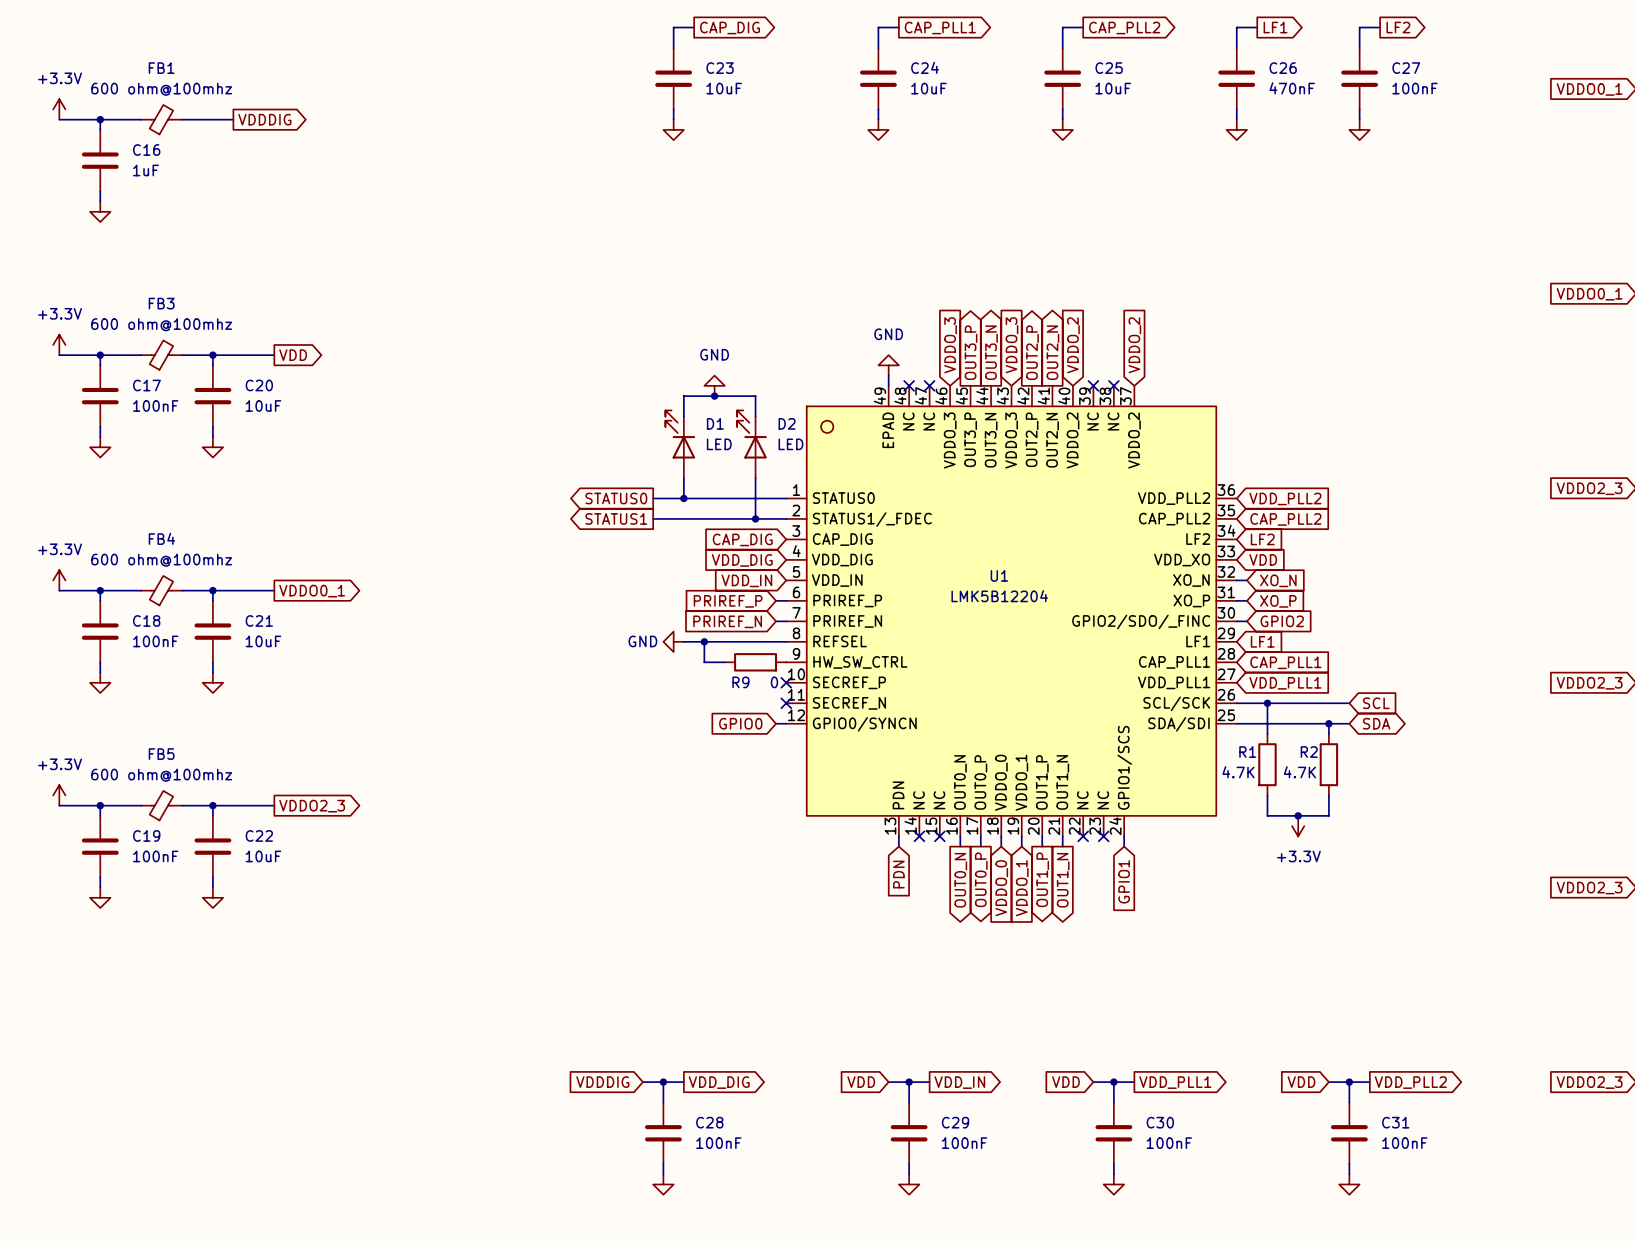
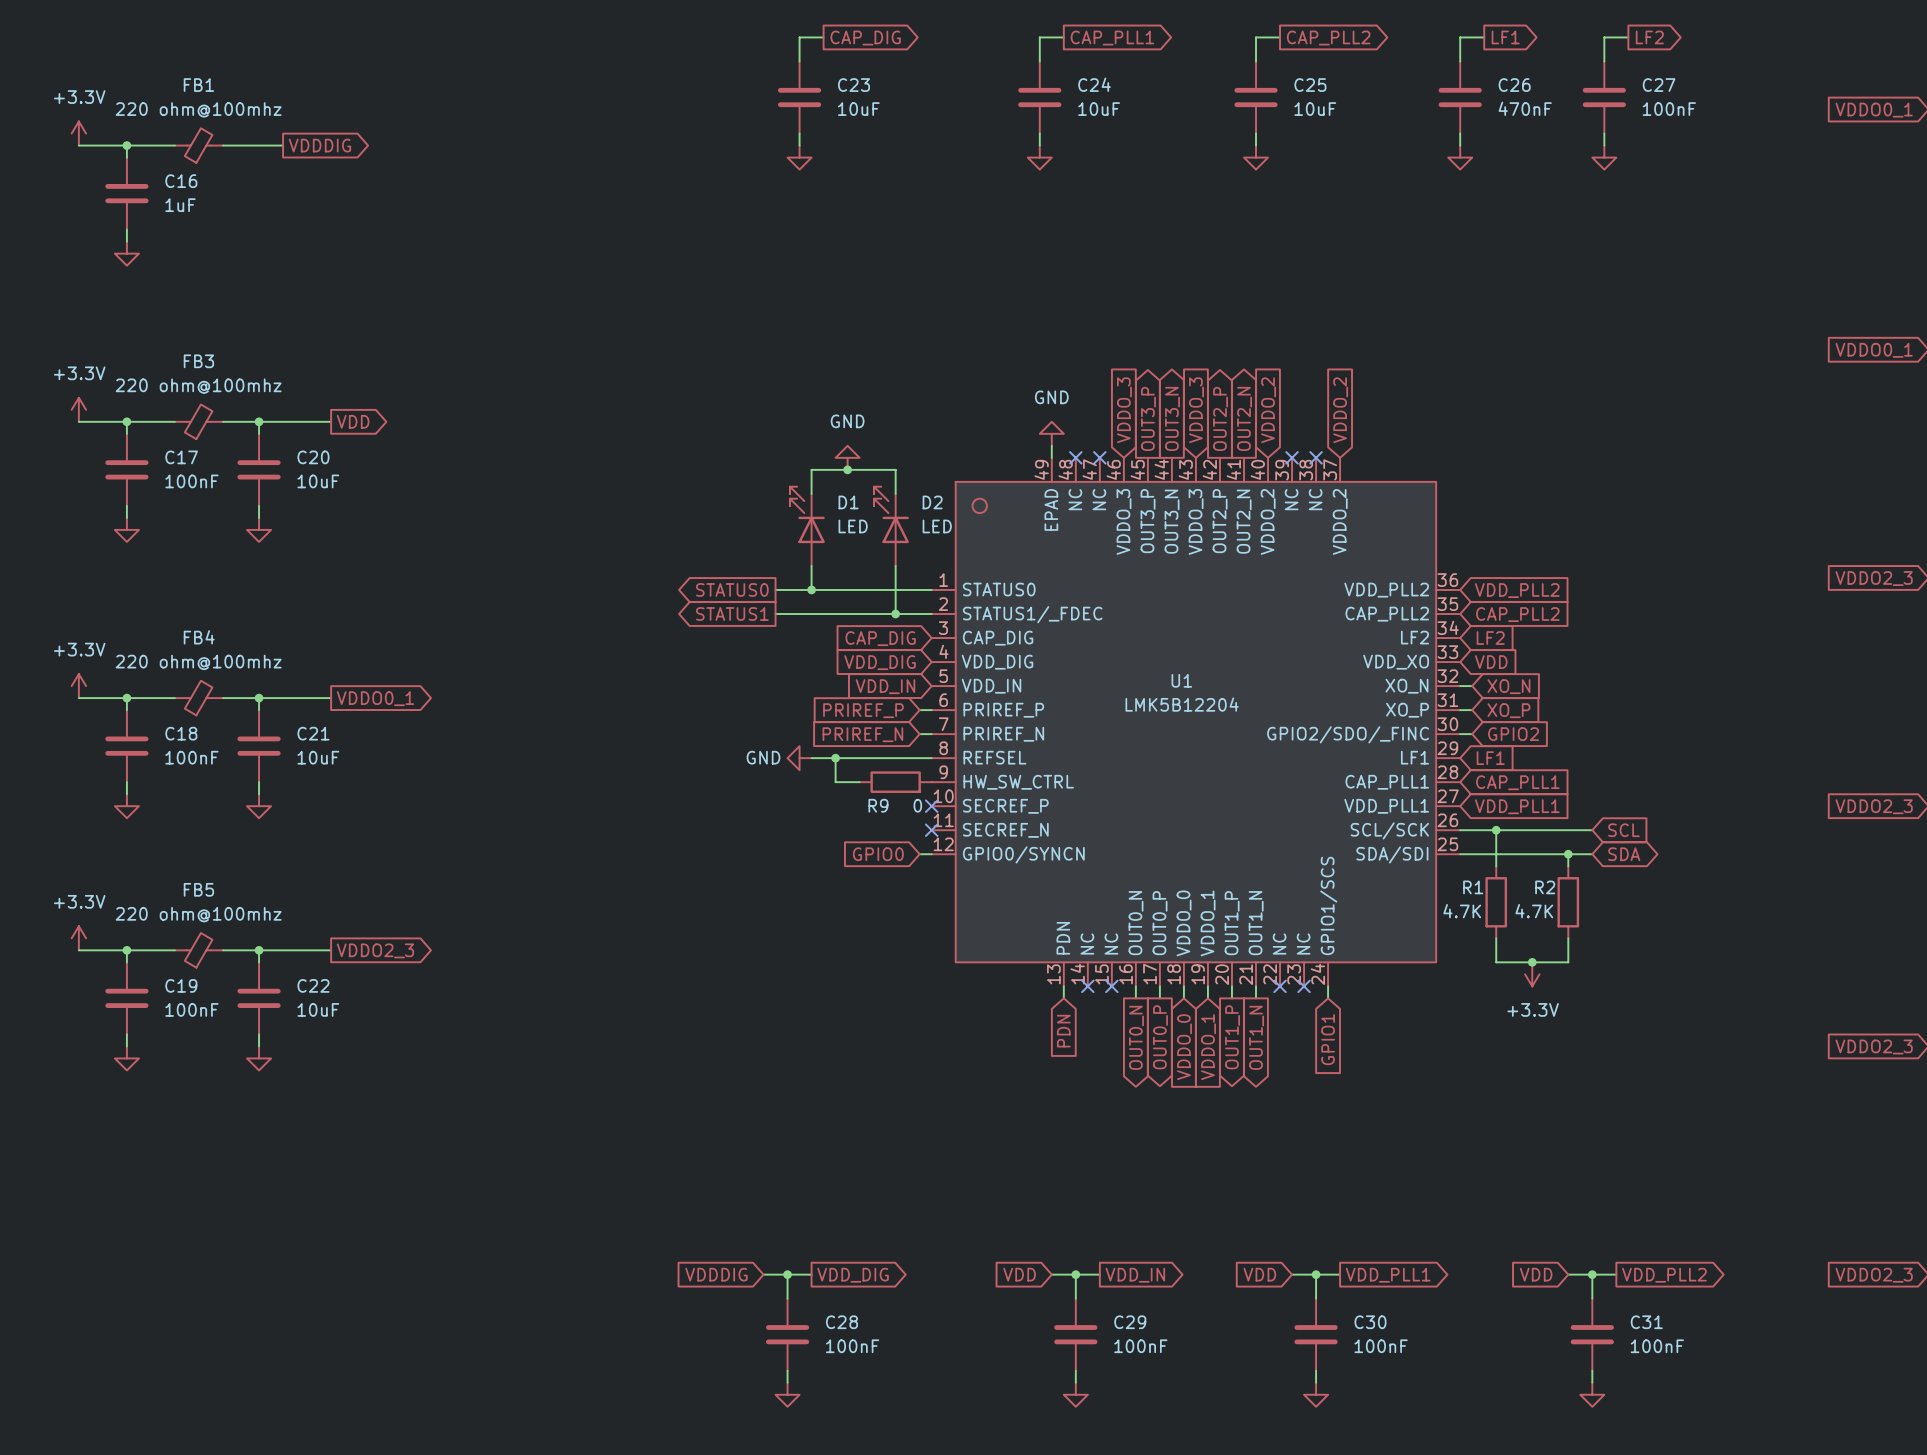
FB1 value: 600 ohm@100mhz (161, 89) -> 220 ohm@100mhz (198, 109)
FB3 value: 600 ohm@100mhz (161, 324) -> 220 ohm@100mhz (198, 386)
FB4 value: 600 ohm@100mhz (161, 560) -> 220 ohm@100mhz (198, 662)
FB5 value: 600 ohm@100mhz (161, 775) -> 220 ohm@100mhz (198, 914)

